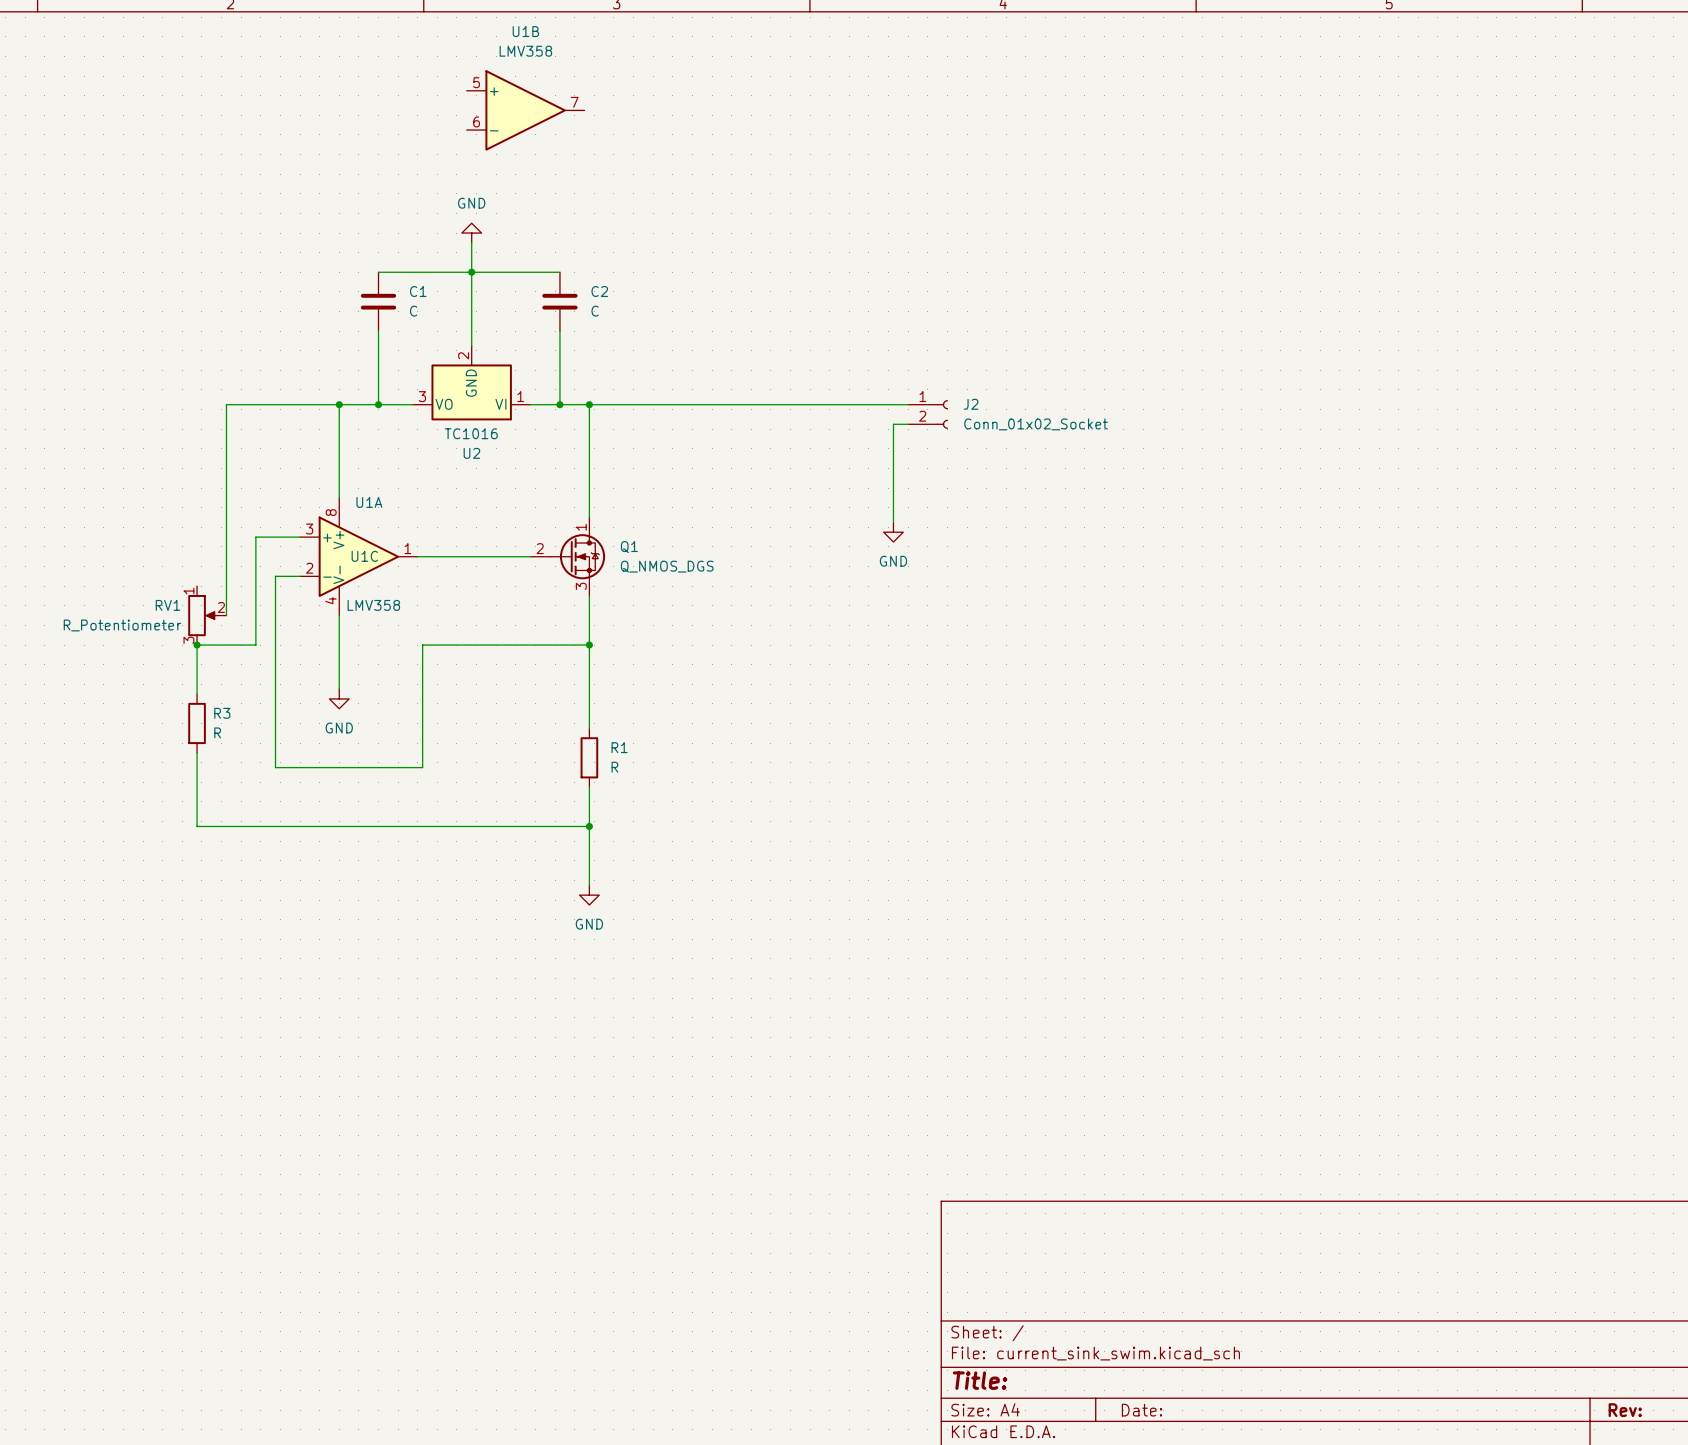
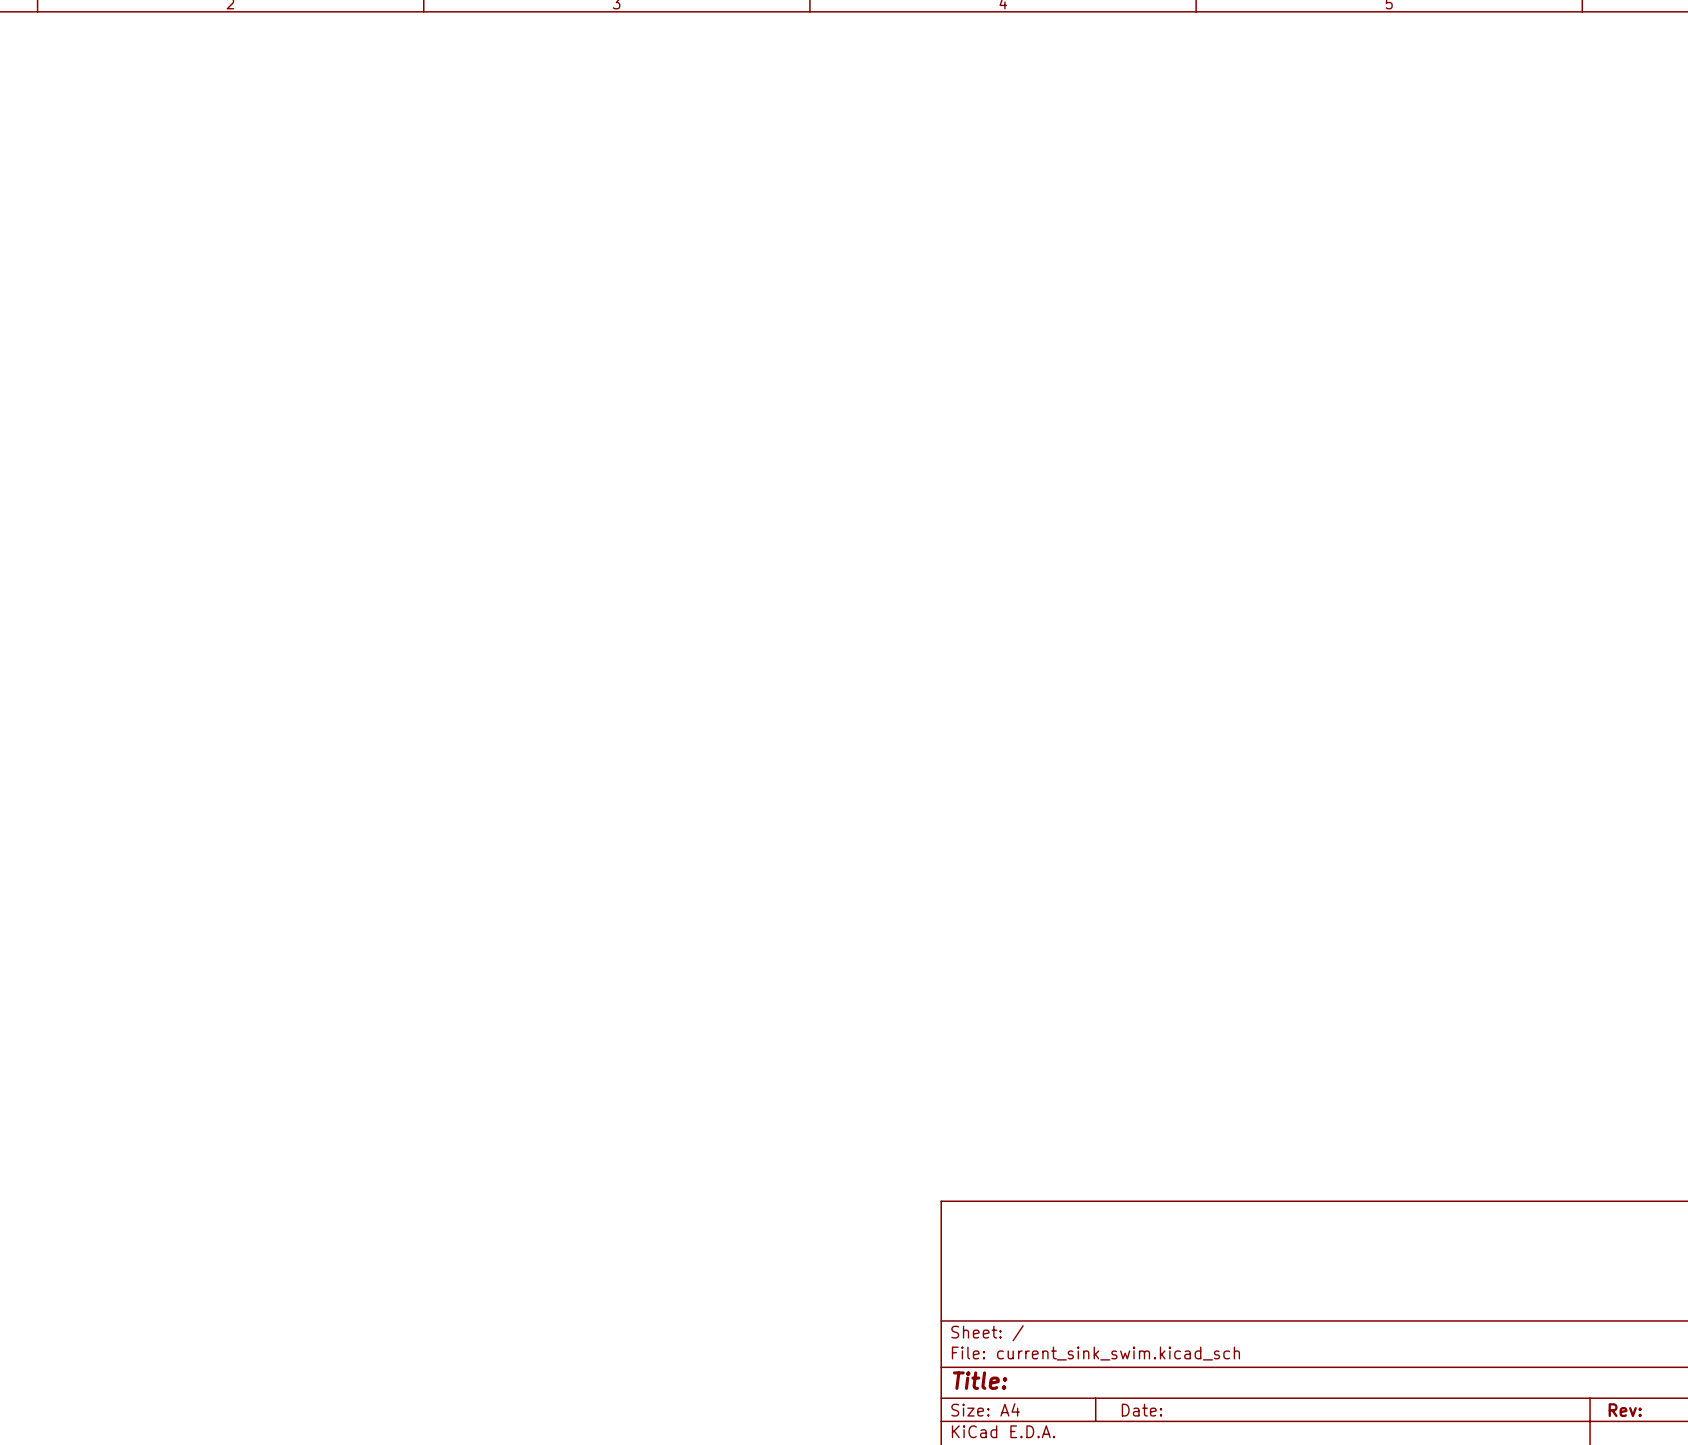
U1B: LMV358 (525, 110) -> none
power symbol: GND (471, 233) -> none
wire: (471, 242) (471, 345) -> none
wire: (378, 272) (559, 272) -> none
junction: (471, 272) -> none
C1: C (378, 301) -> none
C2: C (559, 301) -> none
wire: (378, 331) (378, 404) -> none
wire: (559, 331) (559, 404) -> none
U2: TC1016 (471, 383) -> none
wire: (339, 404) (339, 497) -> none
junction: (339, 404) -> none
junction: (378, 404) -> none
wire: (412, 404) (226, 404) (226, 615) -> none
wire: (530, 404) (908, 404) -> none
junction: (559, 404) -> none
wire: (589, 404) (589, 517) -> none
junction: (589, 404) -> none
J2: Conn_01x02_Socket (928, 414) -> none
wire: (908, 424) (893, 424) (893, 522) -> none
power symbol: GND (893, 532) -> none
wire: (300, 537) (255, 537) (255, 645) (197, 645) (197, 694) -> none
U1C: (339, 556) -> none
U1A: LMV358 (358, 556) -> none
wire: (417, 556) (530, 556) -> none
Q1: Q_NMOS_DGS (567, 556) -> none
wire: (300, 576) (275, 576) (275, 767) (422, 767) (422, 645) (589, 645) -> none
wire: (589, 595) (589, 728) -> none
RV1: R_Potentiometer (207, 615) -> none
wire: (339, 615) (339, 689) -> none
junction: (197, 645) -> none
junction: (589, 645) -> none
power symbol: GND (339, 698) -> none
R3: R (197, 723) -> none
wire: (197, 752) (197, 826) (589, 826) -> none
R1: R (589, 757) -> none
wire: (589, 787) (589, 885) -> none
junction: (589, 826) -> none
power symbol: GND (589, 895) -> none

